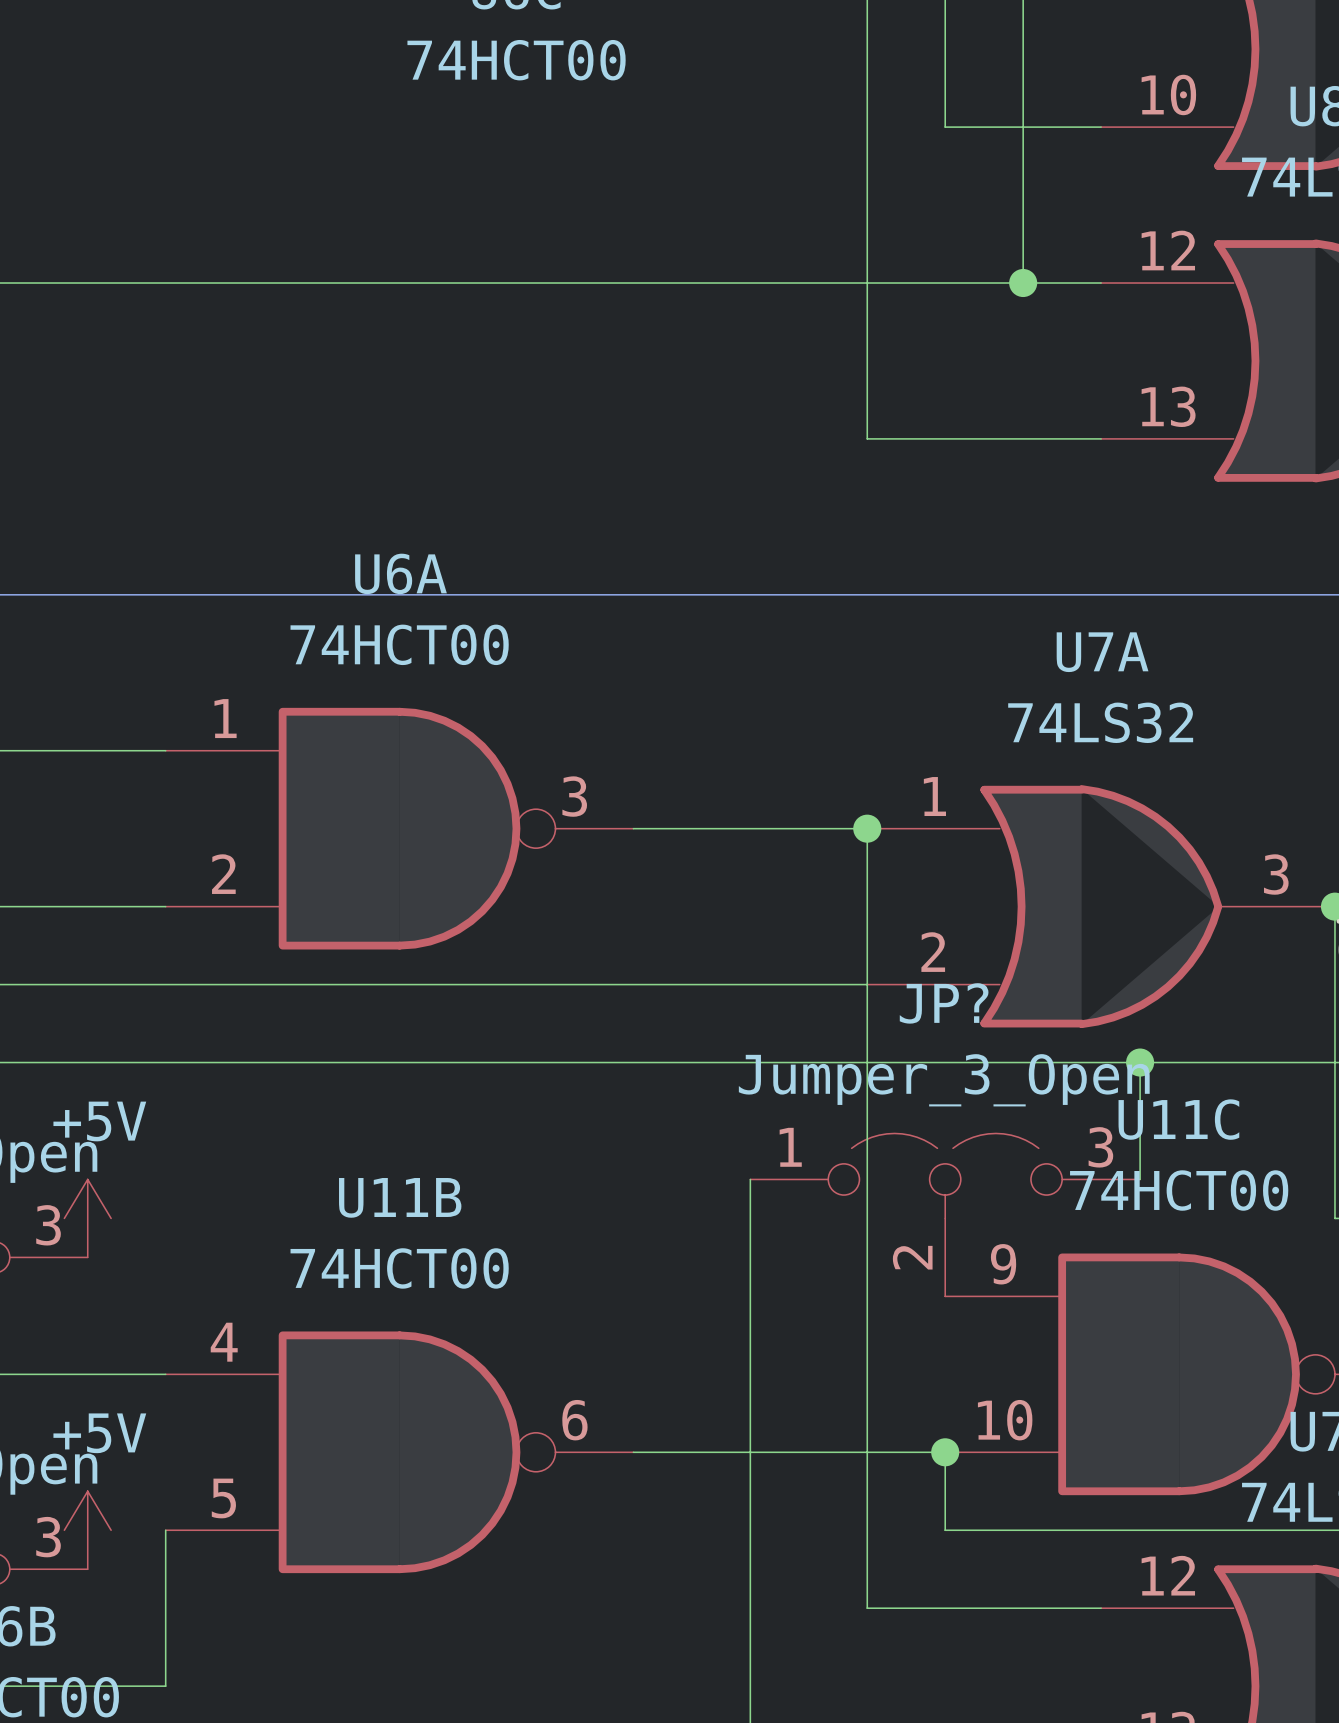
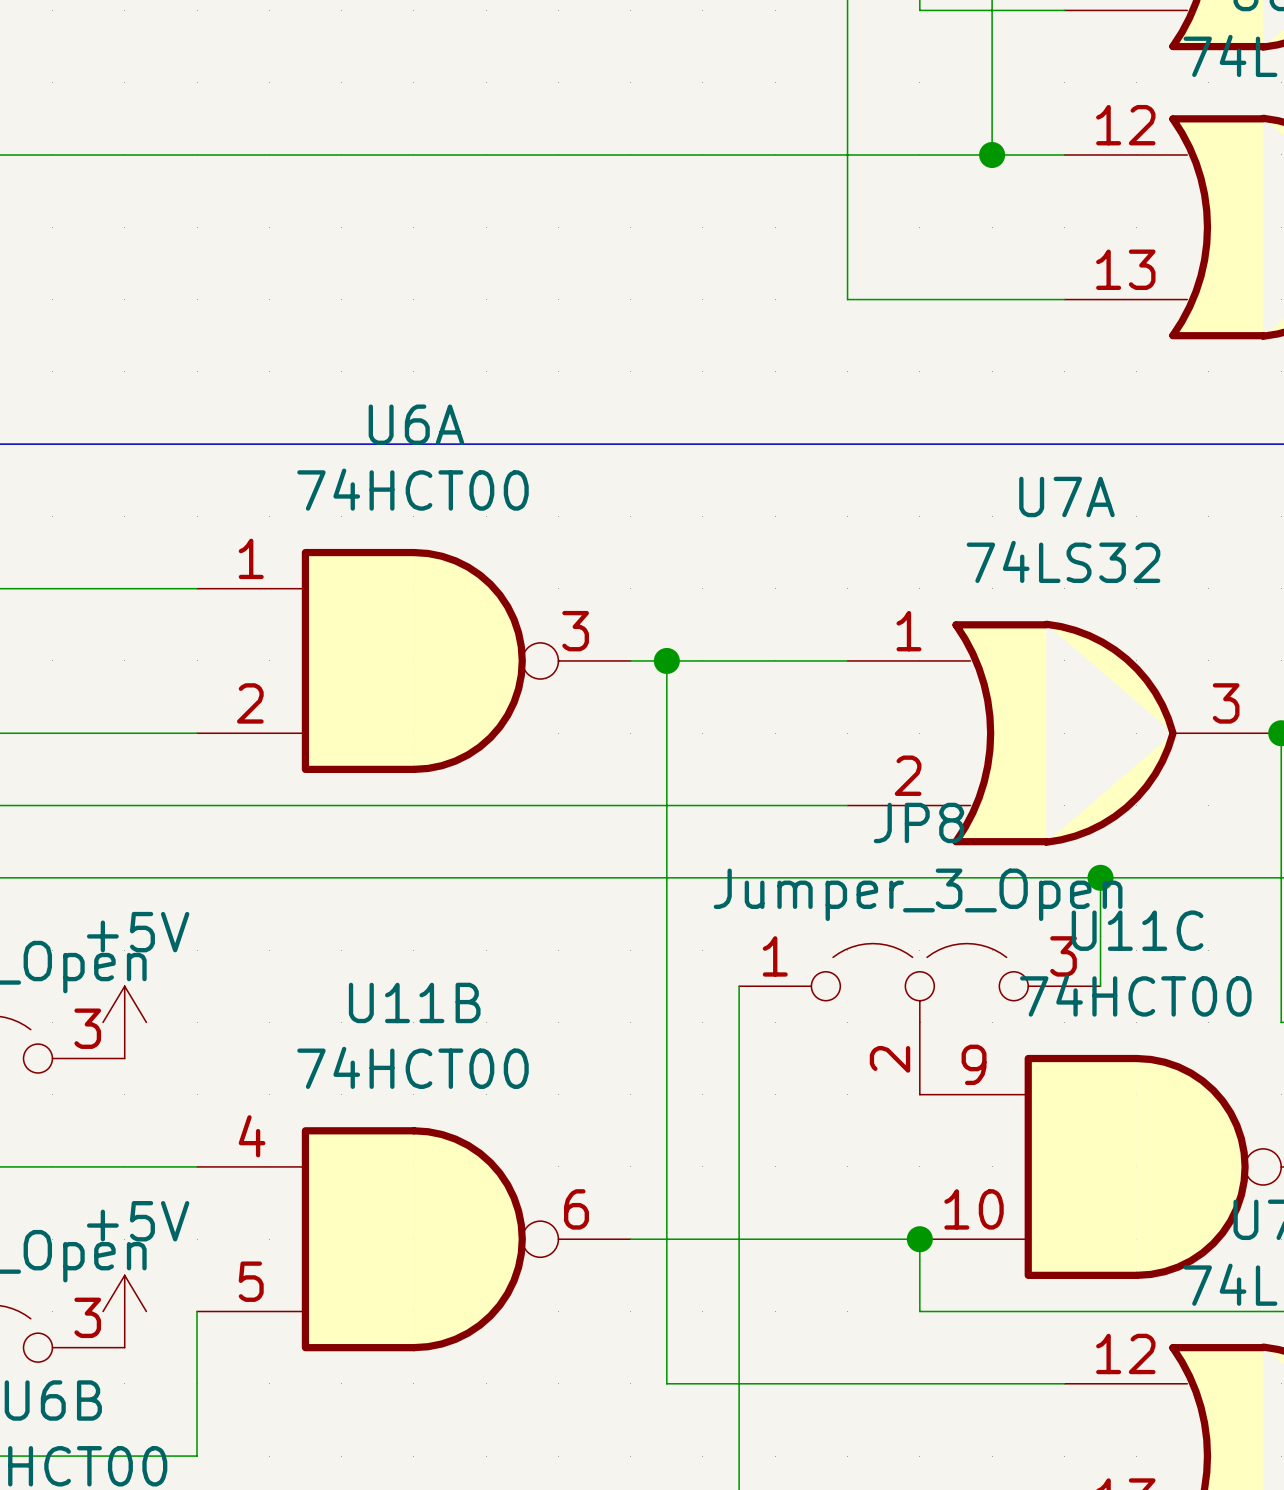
junction: none -> (666, 660)
wire: (867, 828) (867, 1608) -> (666, 660) (666, 1383) (847, 1383)
junction: (867, 828) -> none
JP? name: JP? (944, 1003) -> JP8 (918, 822)

